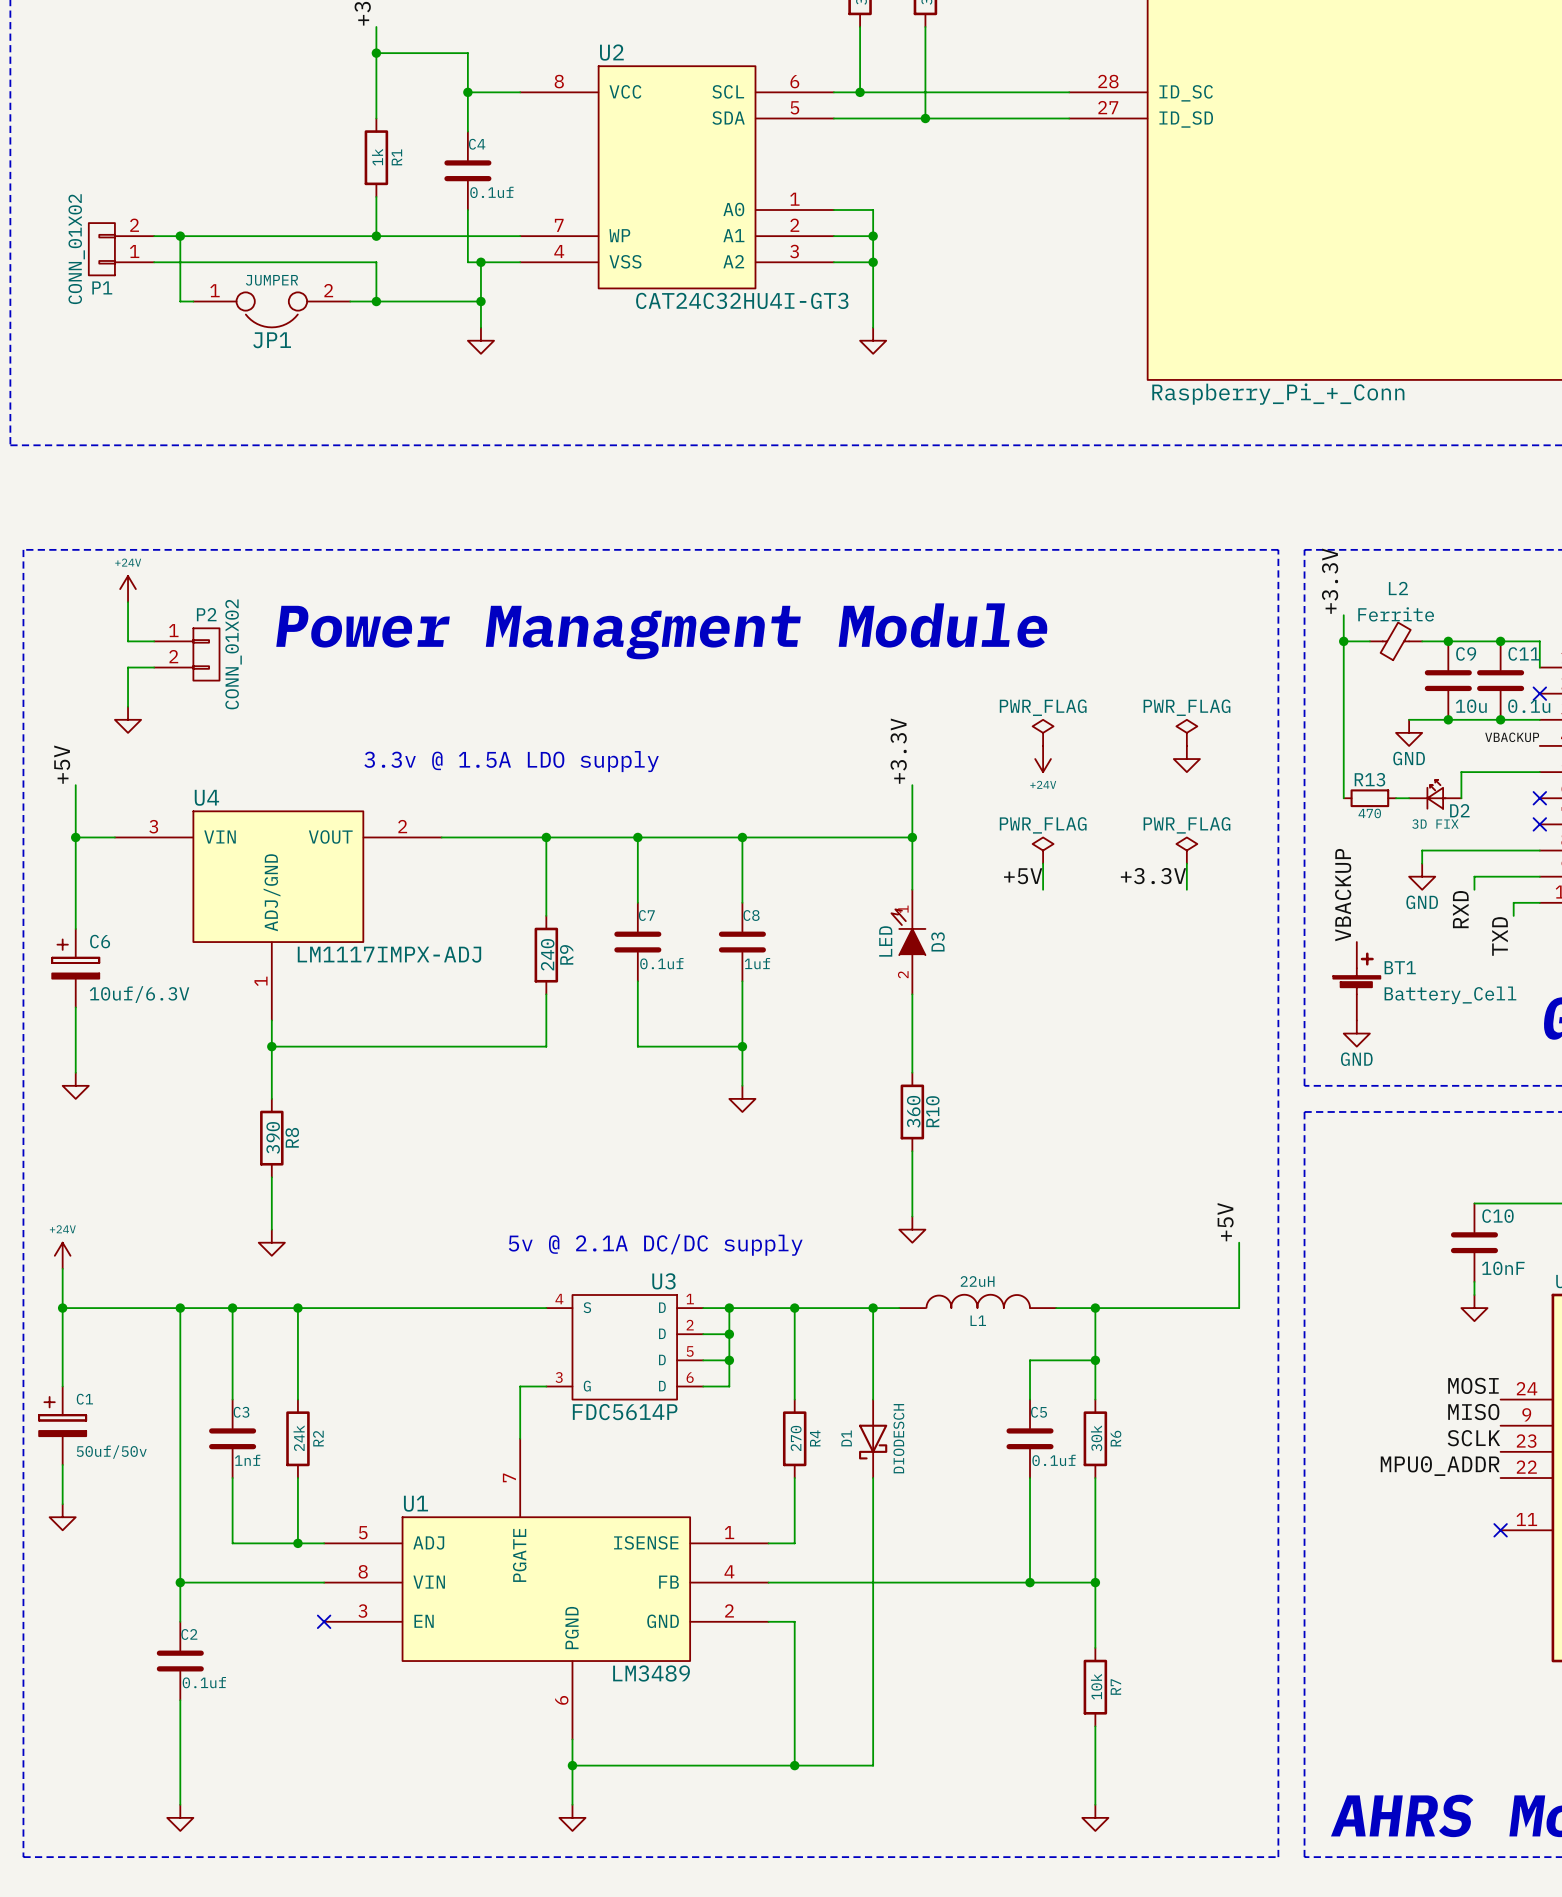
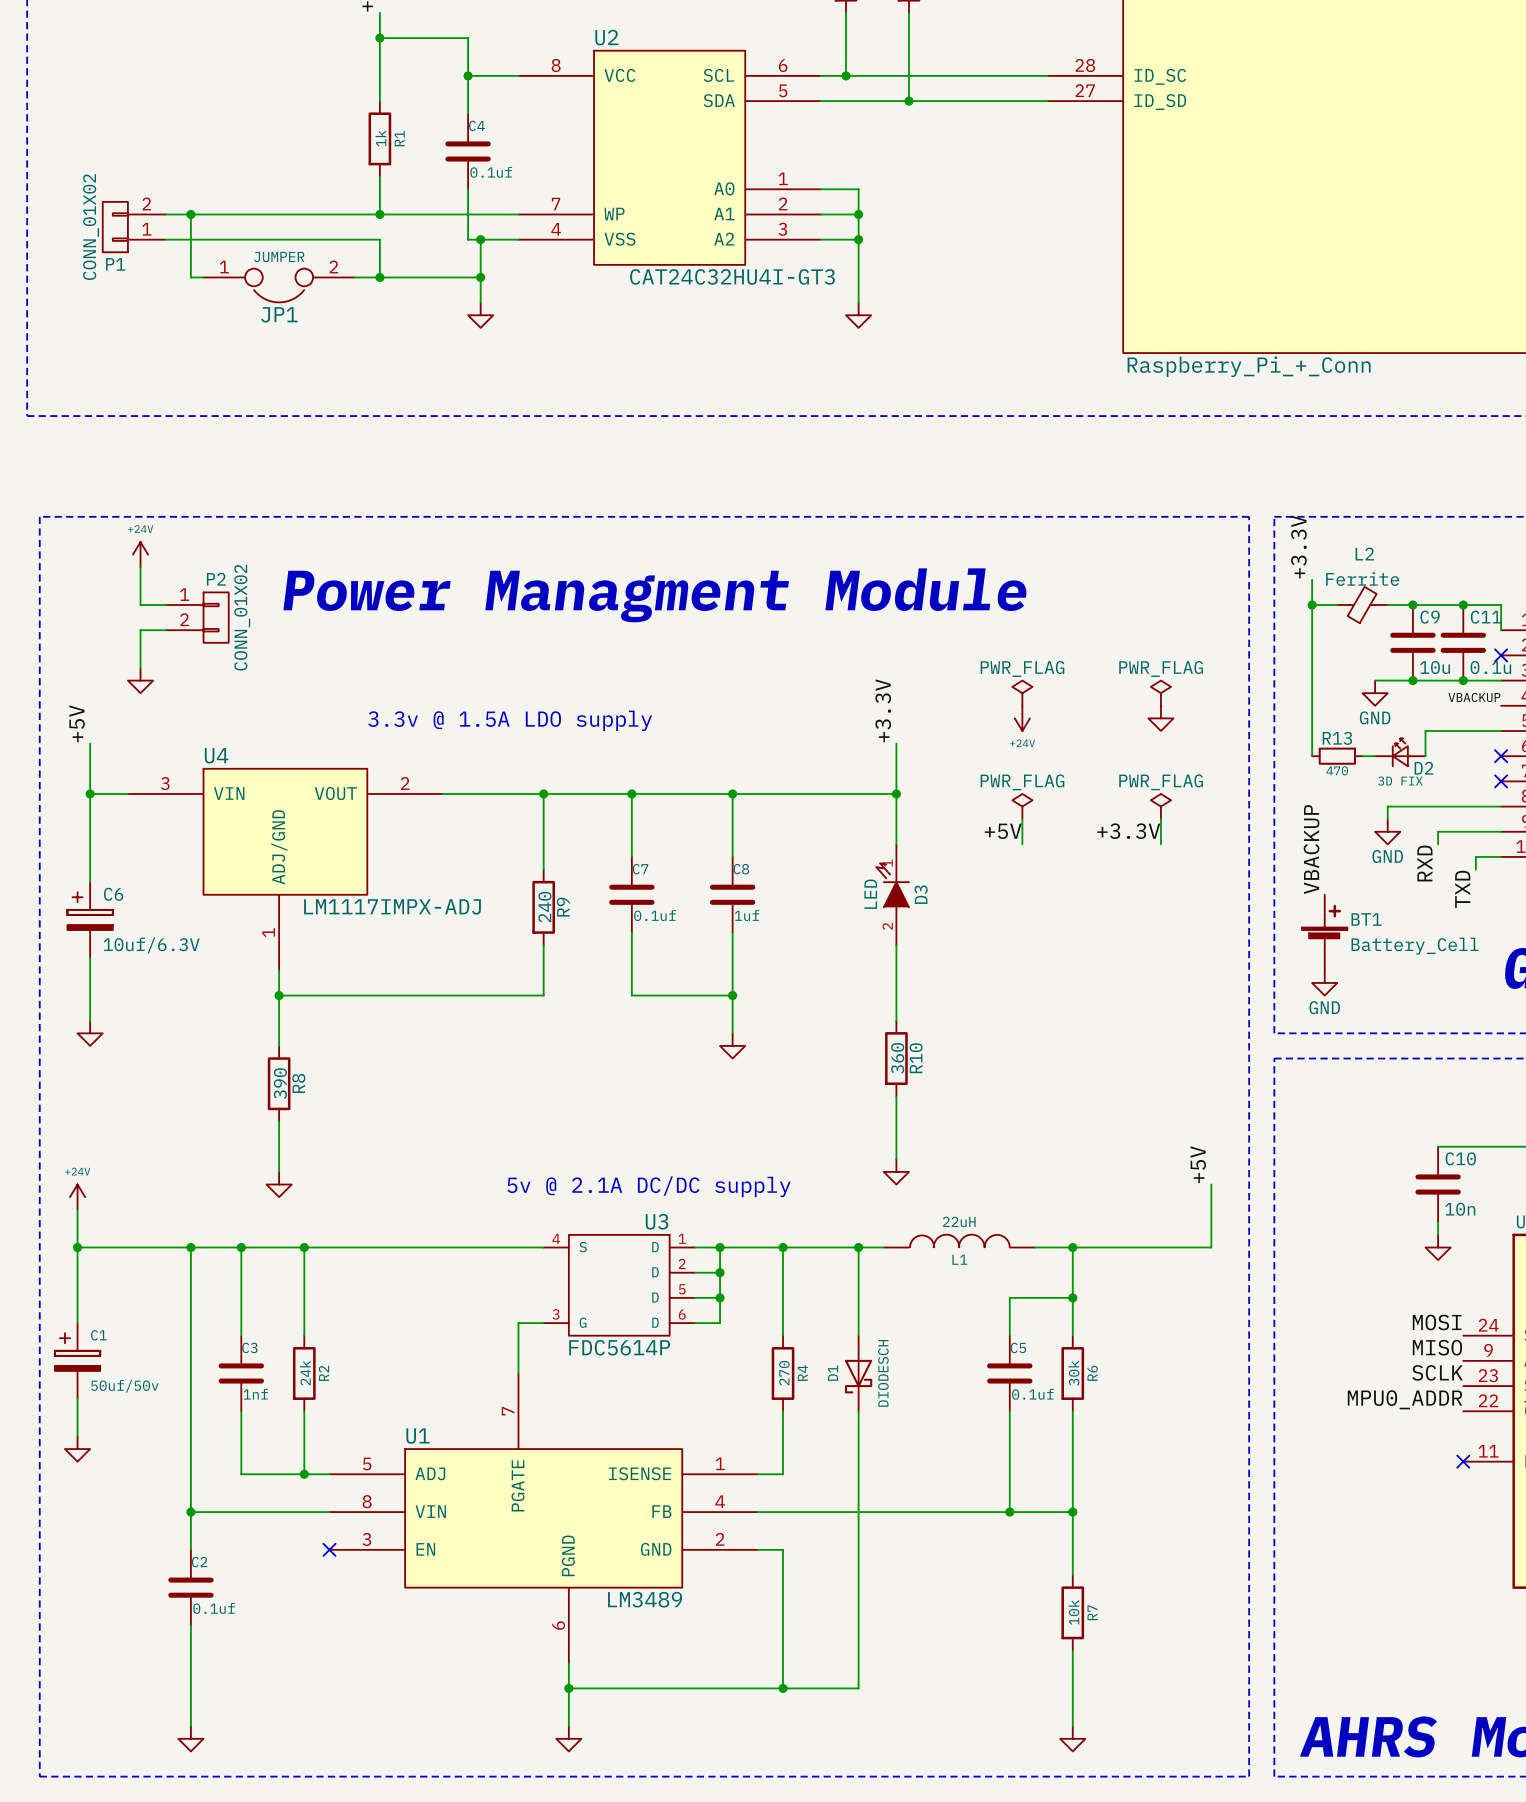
C10 value: 10nF (1503, 1268) -> 10n (1460, 1209)

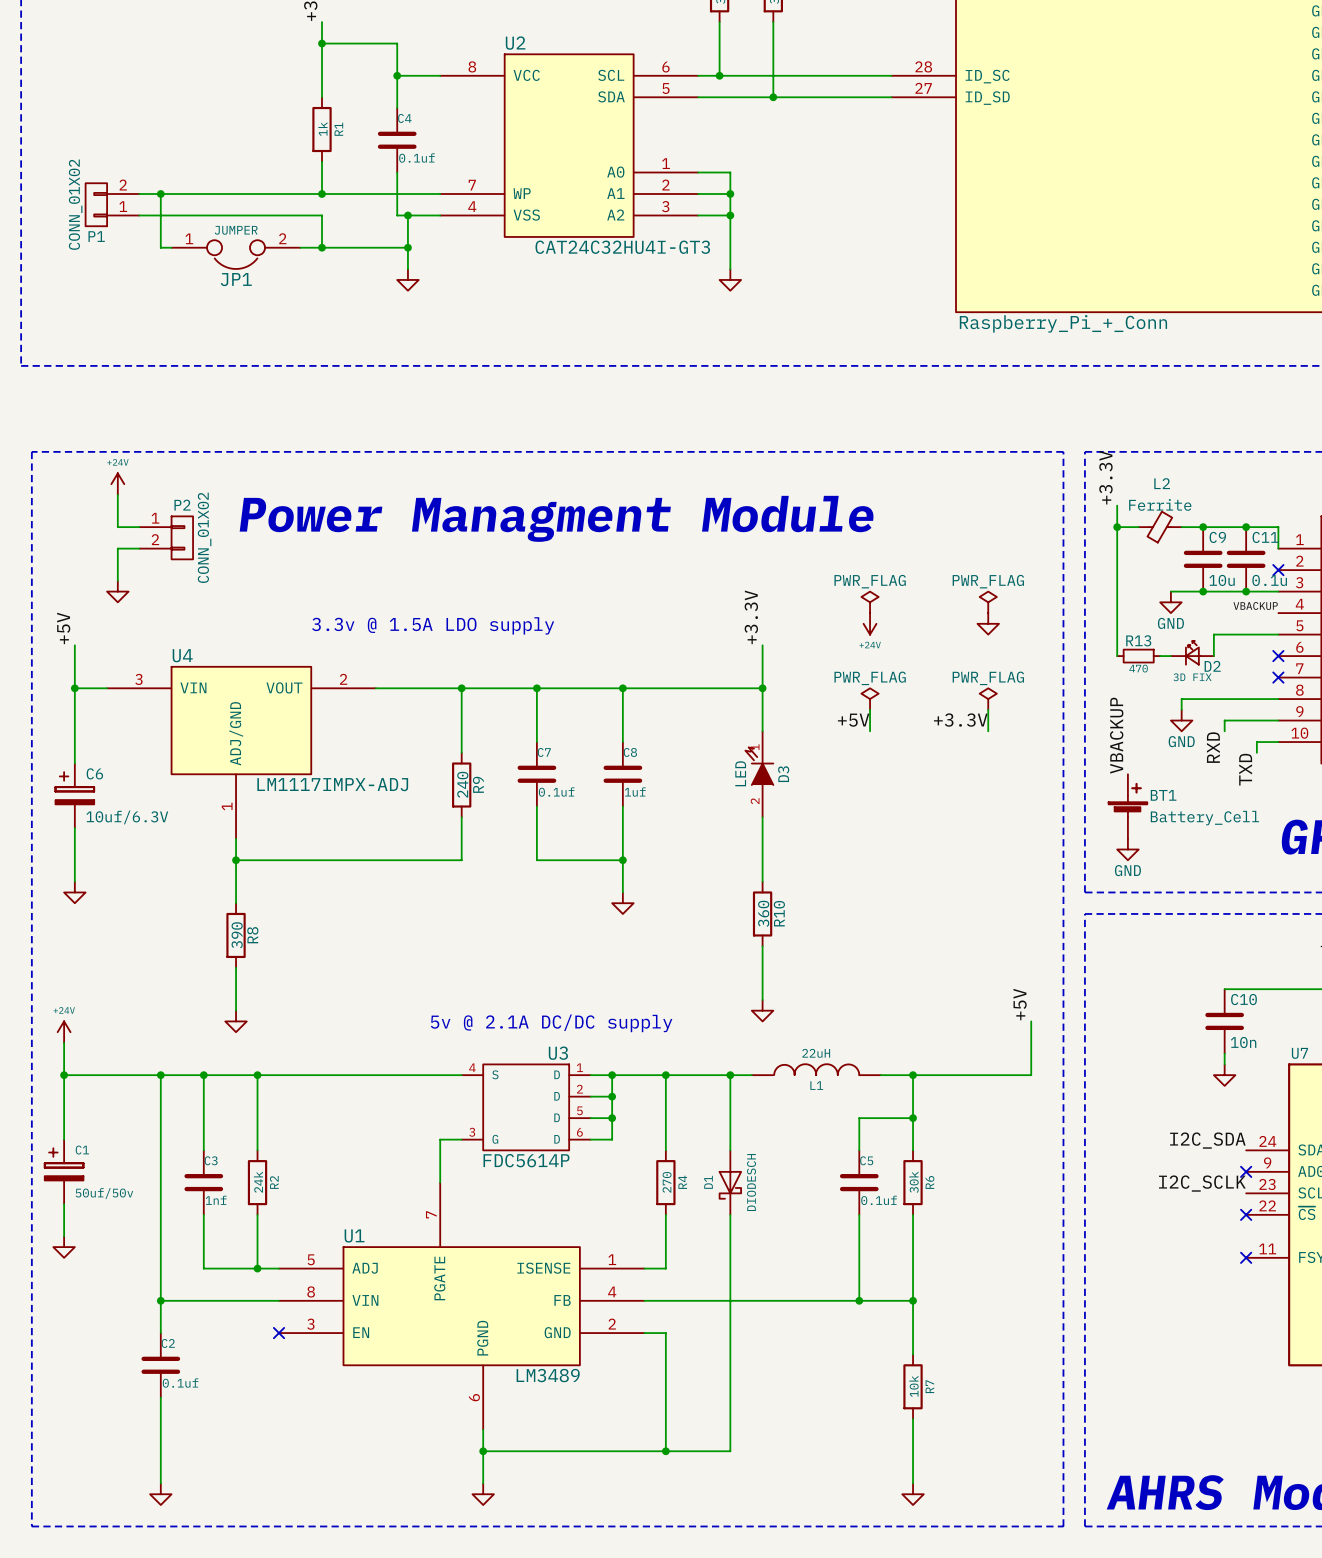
label: MOSI (1437, 1322) -> I2C_SDA (1207, 1140)
label: MISO (1437, 1347) -> none
no-connect mark: none -> (1246, 1171)
label: SCLK (1437, 1372) -> I2C_SCLK (1202, 1183)
label: MPU0_ADDR (1405, 1399) -> none
no-connect mark: none -> (1246, 1214)

